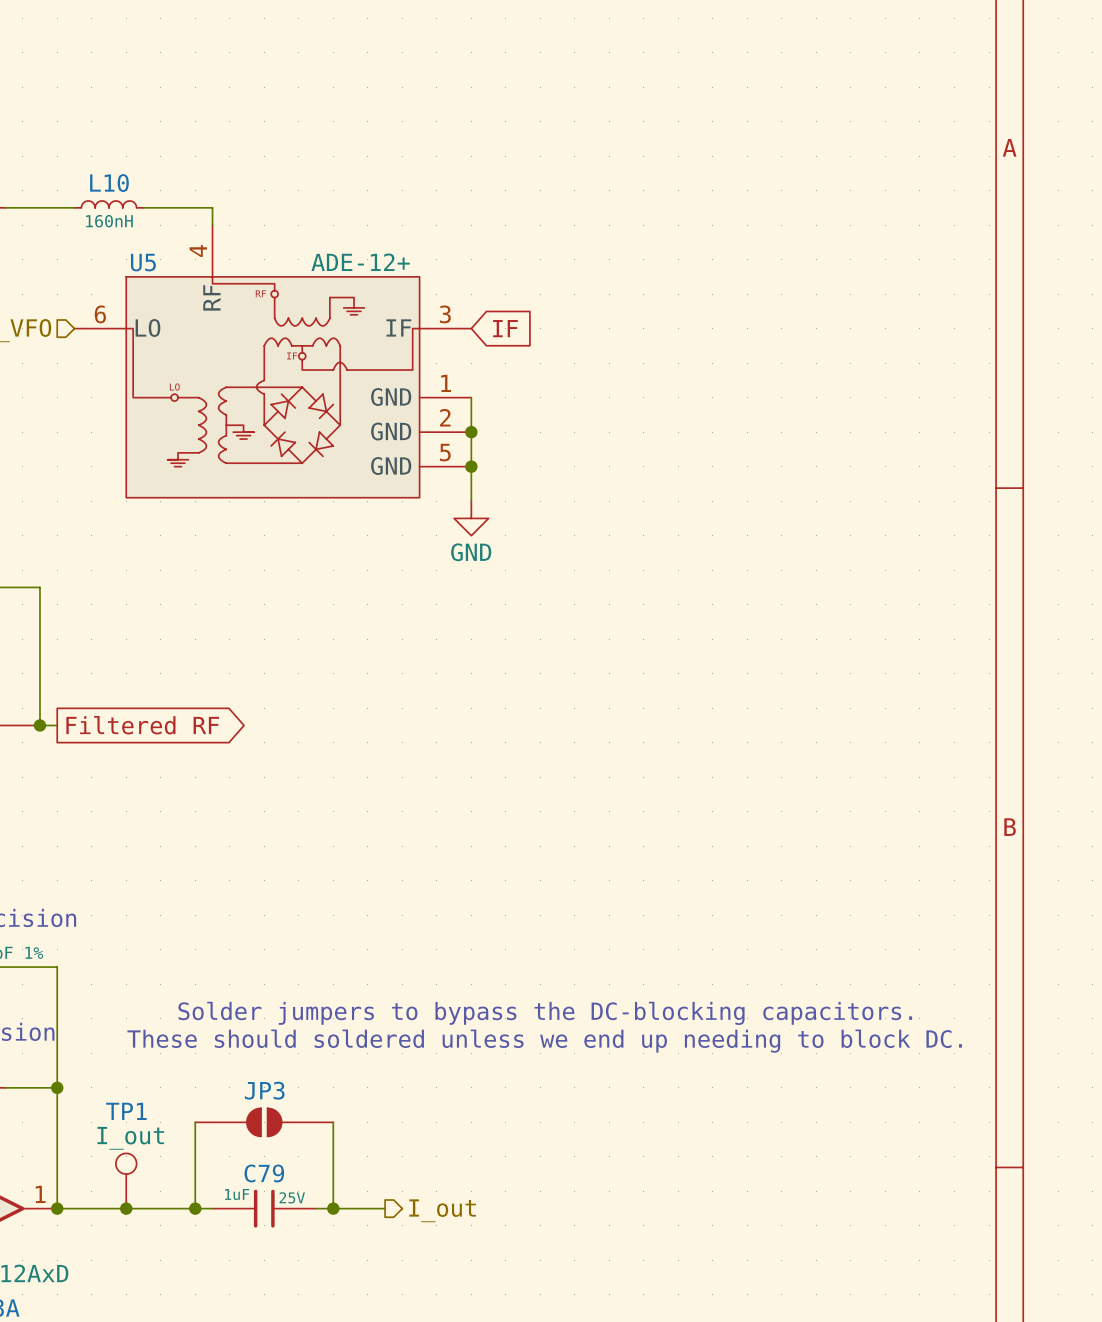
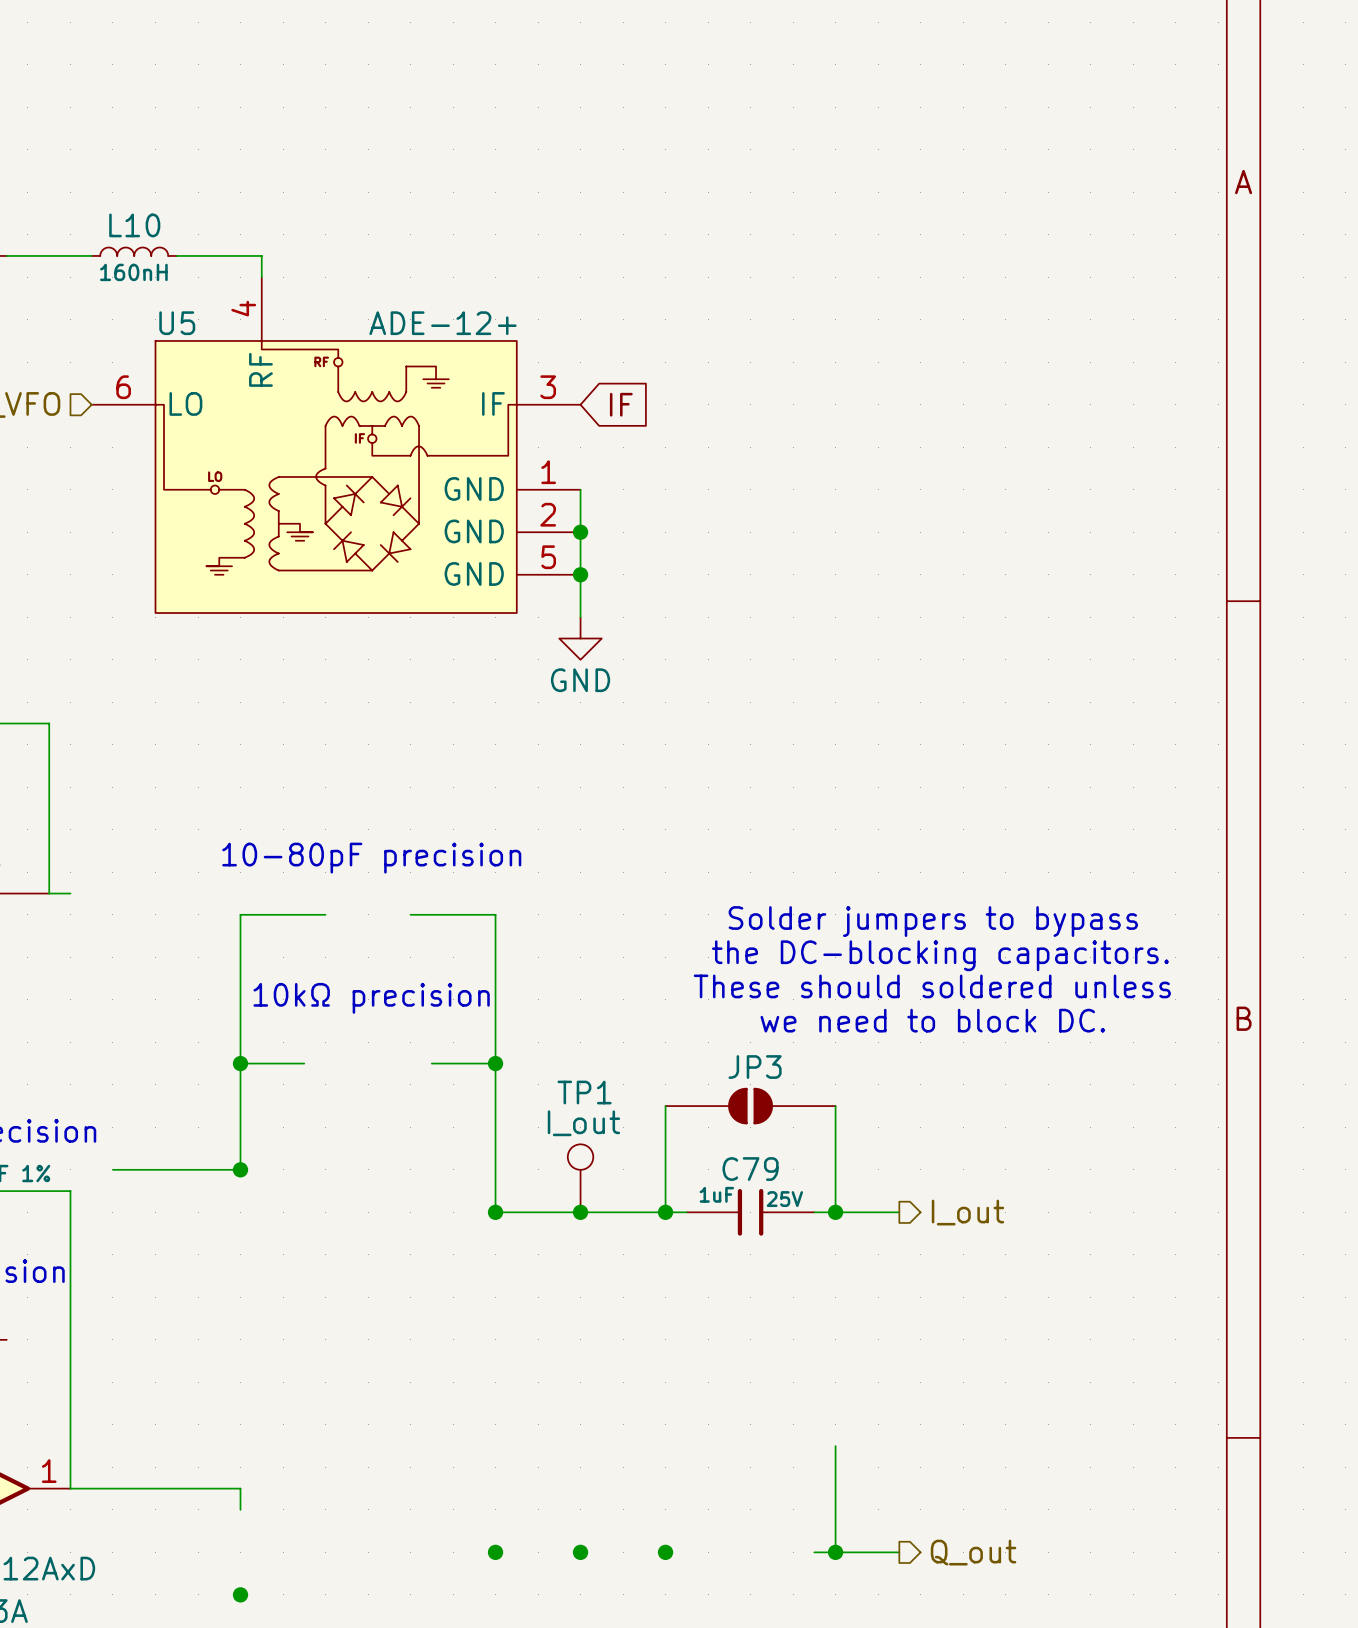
text: none -> 10-80pF precision (371, 858)
junction: (39, 725) -> none
global label: Filtered RF (142, 725) -> none
wire: none -> (325, 914) (240, 914) (240, 1169) (112, 1169)
wire: none -> (410, 914) (495, 914) (495, 1212) (686, 1212)
text: none -> Solder jumpers to bypass (933, 921)
text: none -> the DC-blocking capacitors. (940, 955)
text: none -> These should soldered unless (932, 986)
text: none -> 10kΩ precision (371, 998)
text: none -> we need to block DC. (932, 1020)
junction: none -> (240, 1063)
wire: none -> (431, 1063) (495, 1063)
junction: none -> (495, 1063)
wire: none -> (835, 1106) (835, 1212)
junction: none -> (240, 1169)
junction: none -> (495, 1212)
junction: none -> (580, 1212)
junction: none -> (665, 1212)
wire: none -> (814, 1212) (899, 1212)
junction: none -> (835, 1212)
hierarchical label: none -> I_out (967, 1212)
text: Solder jumpers to bypass the DC-blocking capacitors. (545, 1013) -> none
text: These should soldered unless we end up needing to block DC. (544, 1041) -> none
wire: (5, 1087) (57, 1087) -> (240, 1063) (304, 1063)
junction: (57, 1087) -> none
wire: (195, 1122) (195, 1208) (212, 1208) -> none
JP3 position: (264, 1122) -> (750, 1106)
wire: (333, 1122) (333, 1208) -> (665, 1106) (665, 1212)
wire: none -> (835, 1446) (835, 1552)
TP1 position: (126, 1181) -> (580, 1178)
junction: (57, 1208) -> none
junction: (126, 1208) -> none
wire: none -> (240, 1488) (240, 1509)
junction: (195, 1208) -> none
C79 position: (264, 1208) -> (750, 1212)
wire: (316, 1208) (385, 1208) -> none
junction: (333, 1208) -> none
hierarchical label: I_out (442, 1210) -> none
junction: none -> (495, 1552)
junction: none -> (580, 1552)
junction: none -> (665, 1552)
wire: none -> (814, 1552) (899, 1552)
junction: none -> (835, 1552)
hierarchical label: none -> Q_out (973, 1552)
junction: none -> (240, 1594)

